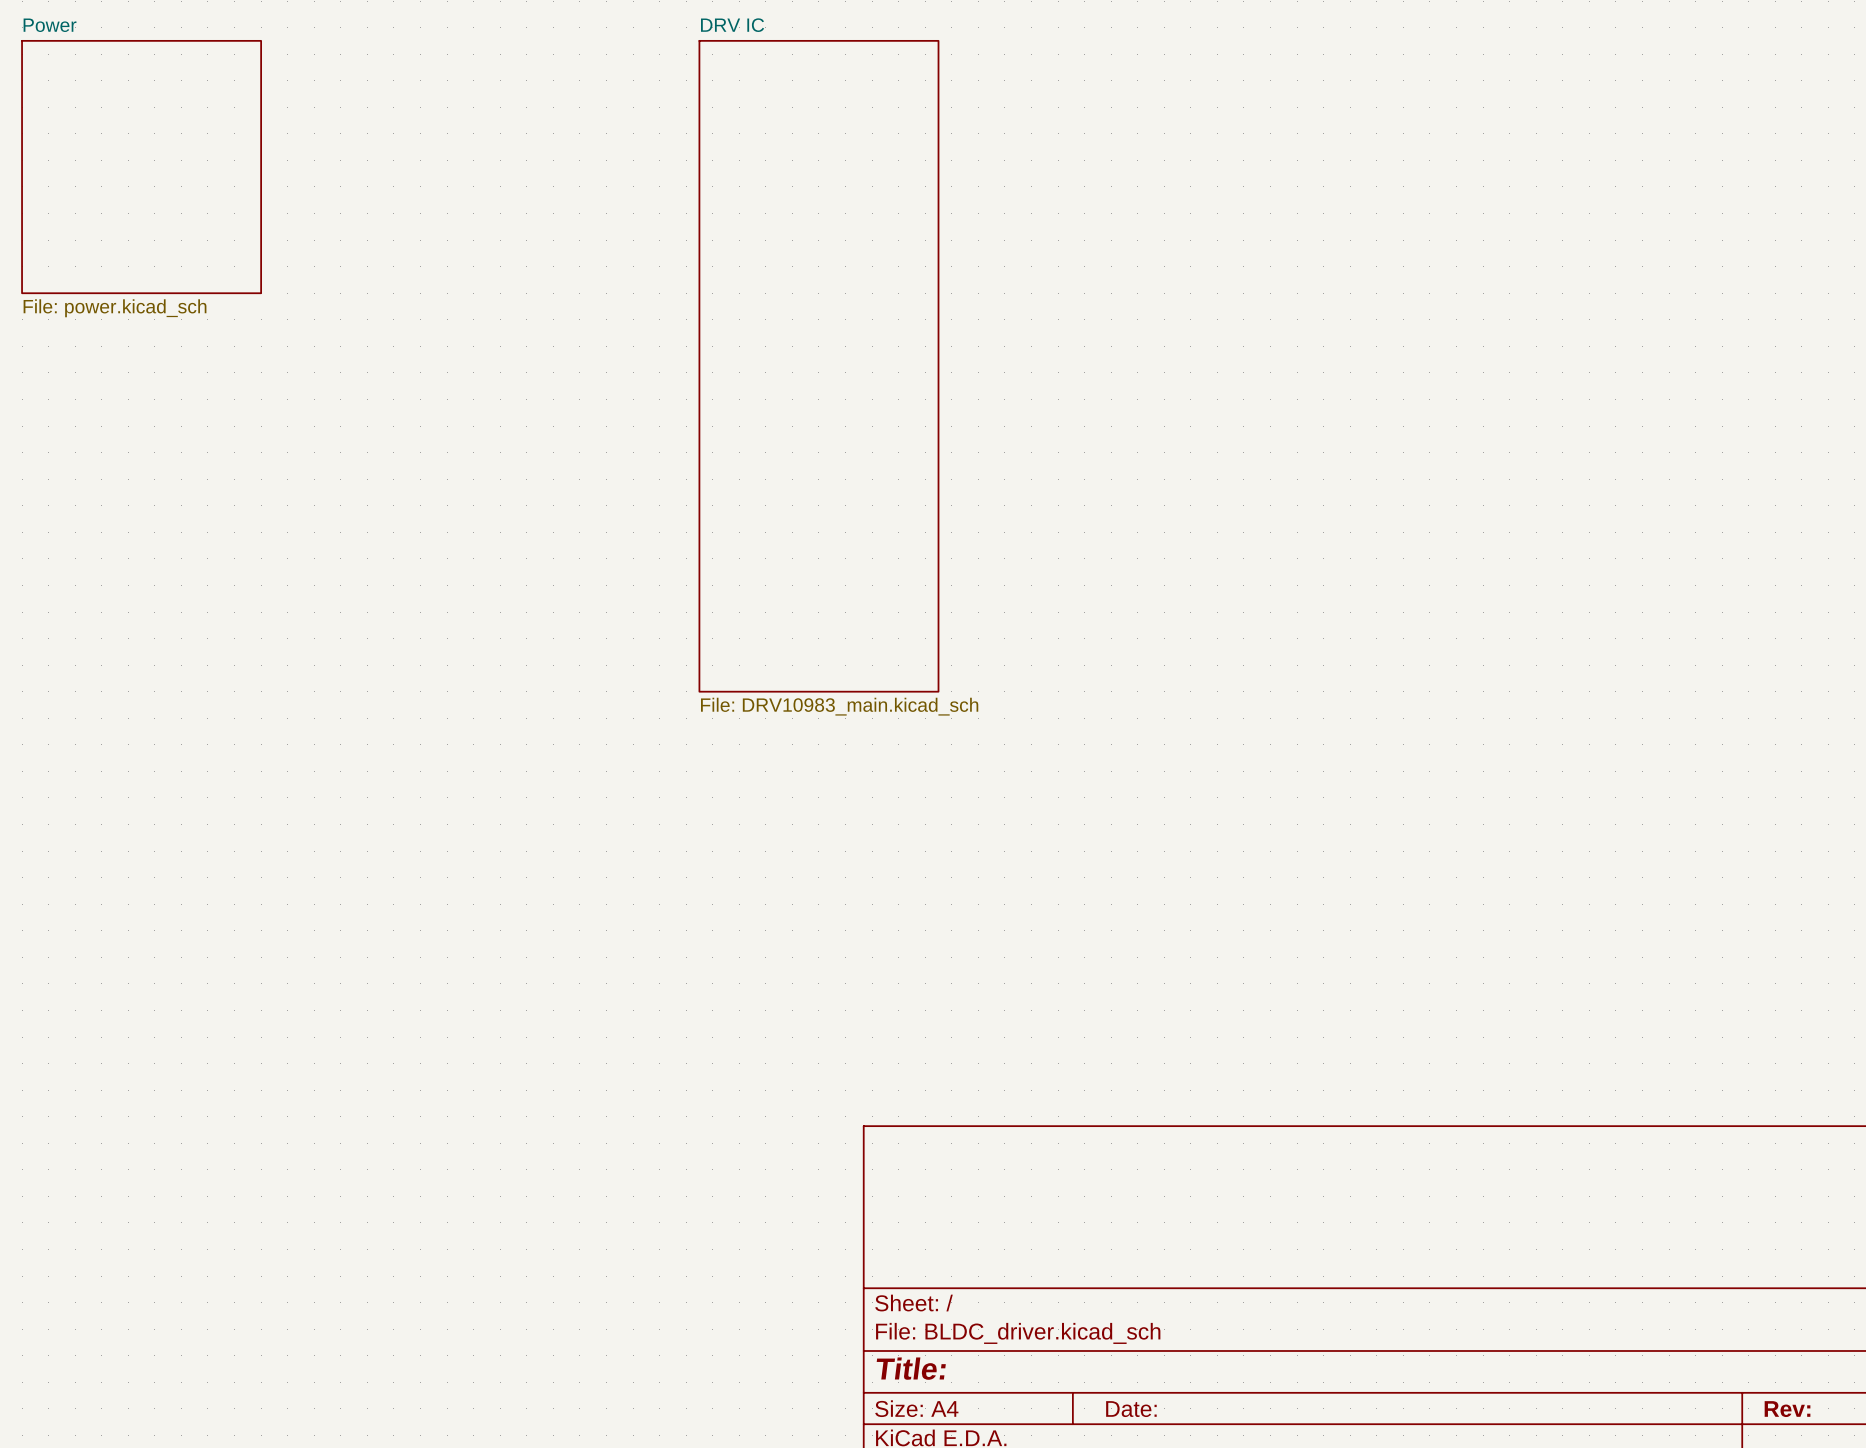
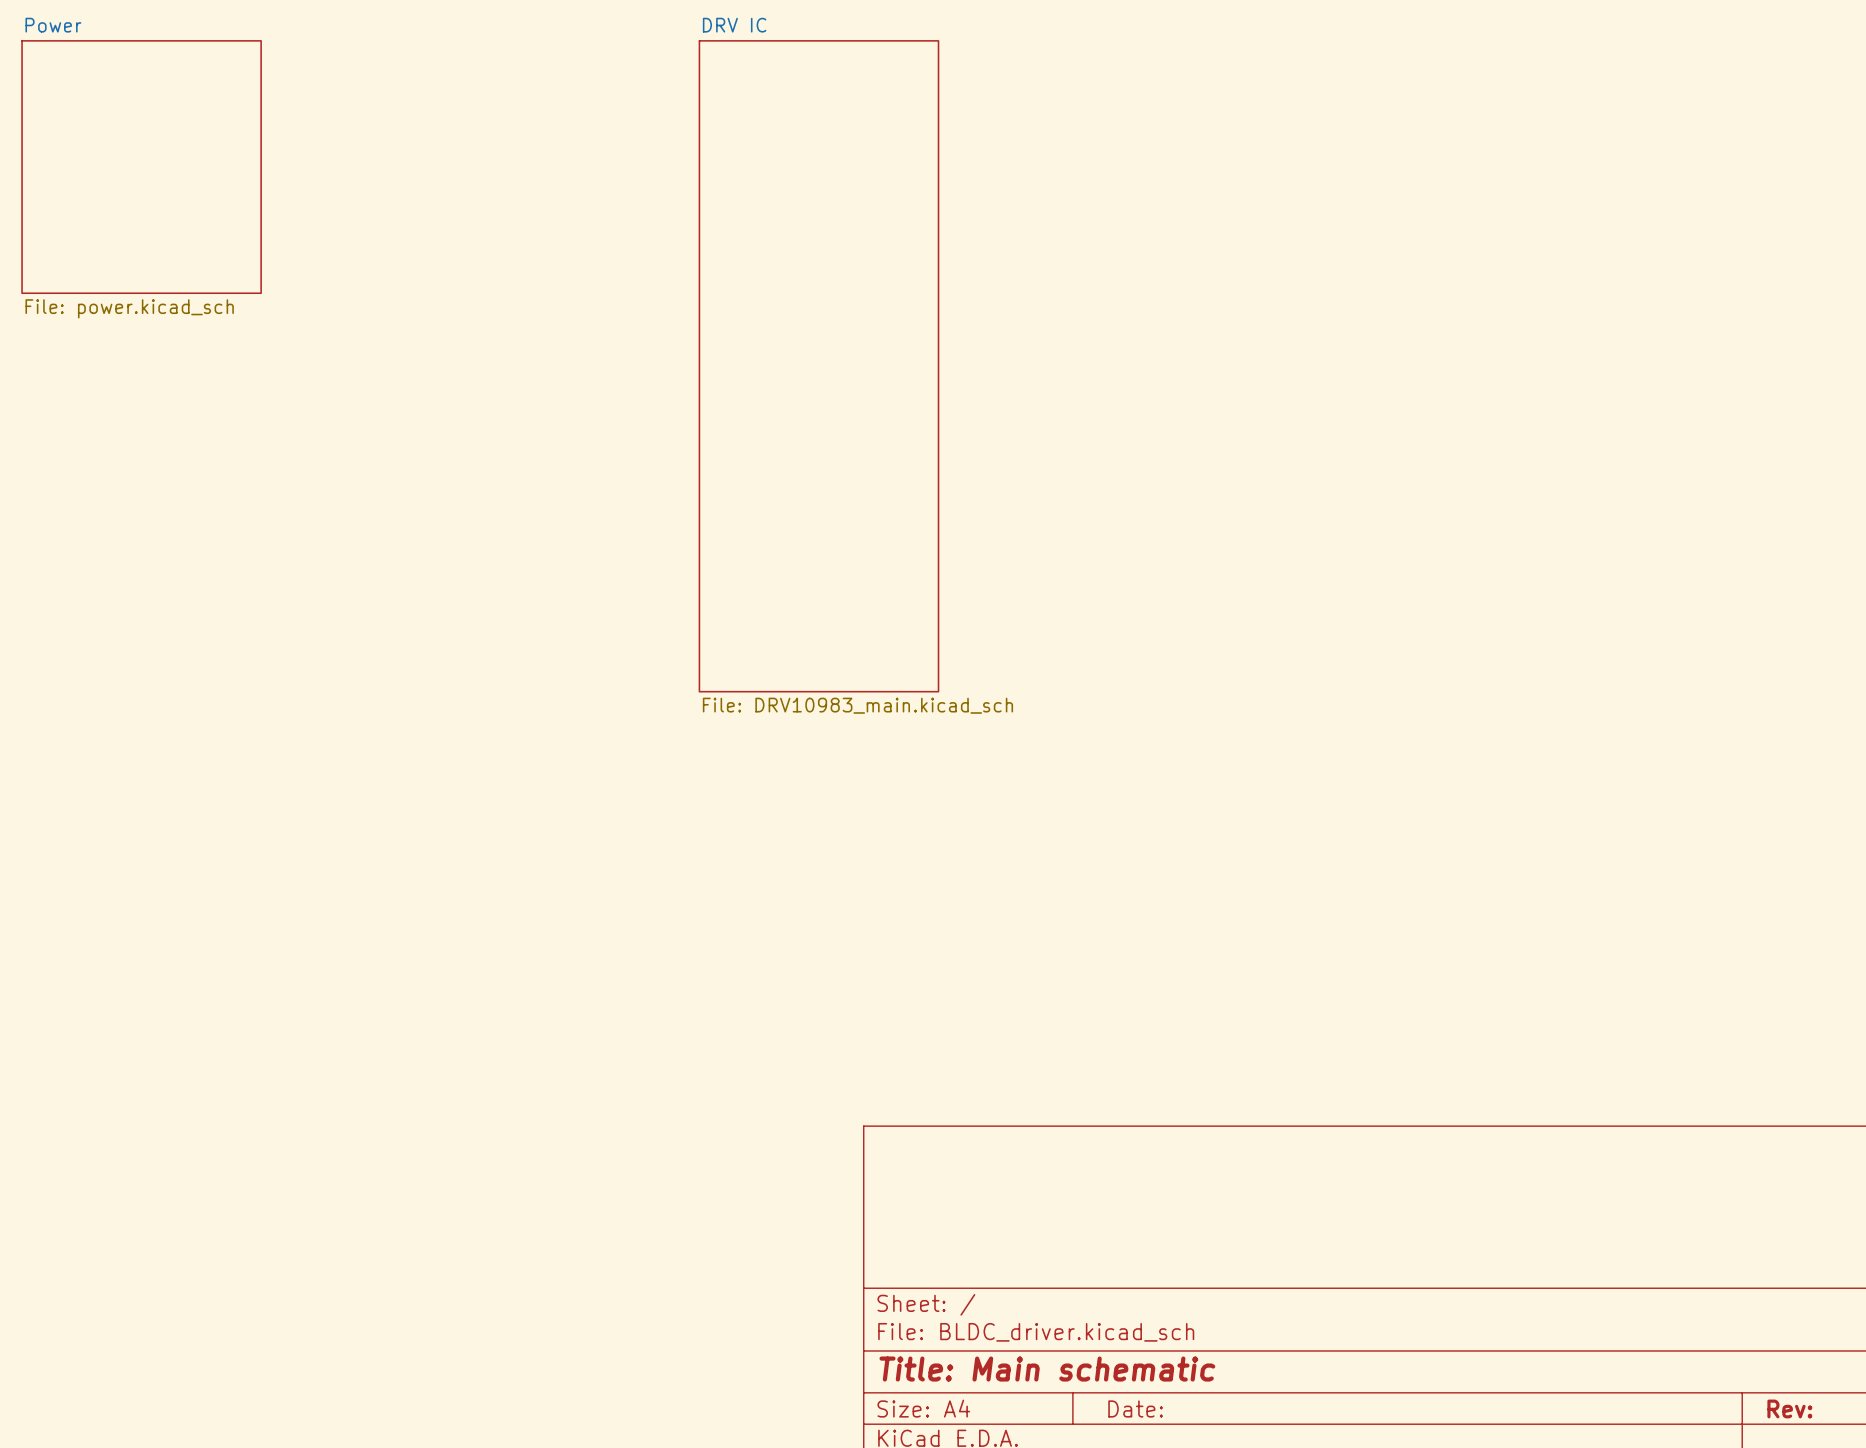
title block: Title: (911, 1368) -> Title: Main schematic (1047, 1369)

